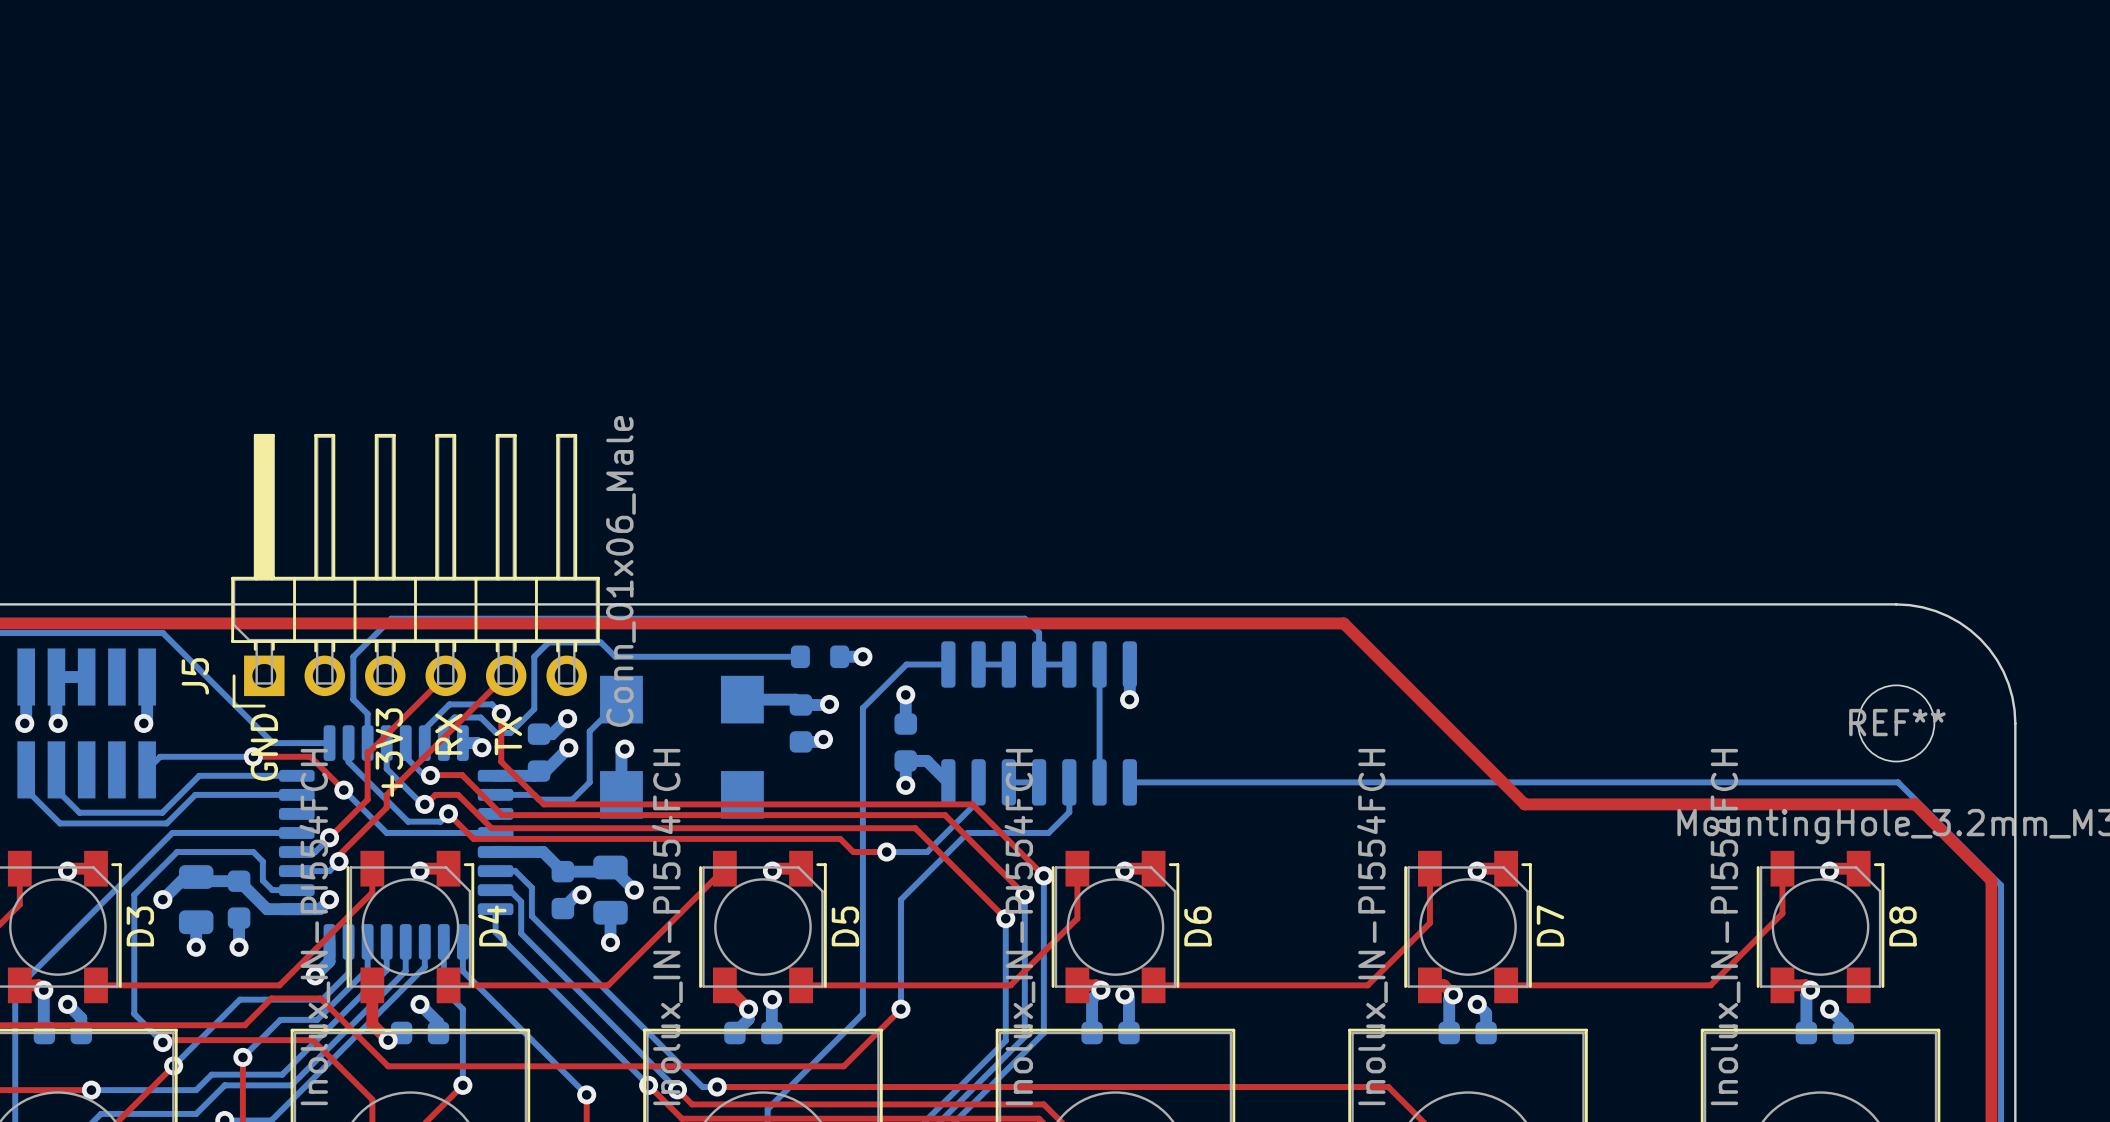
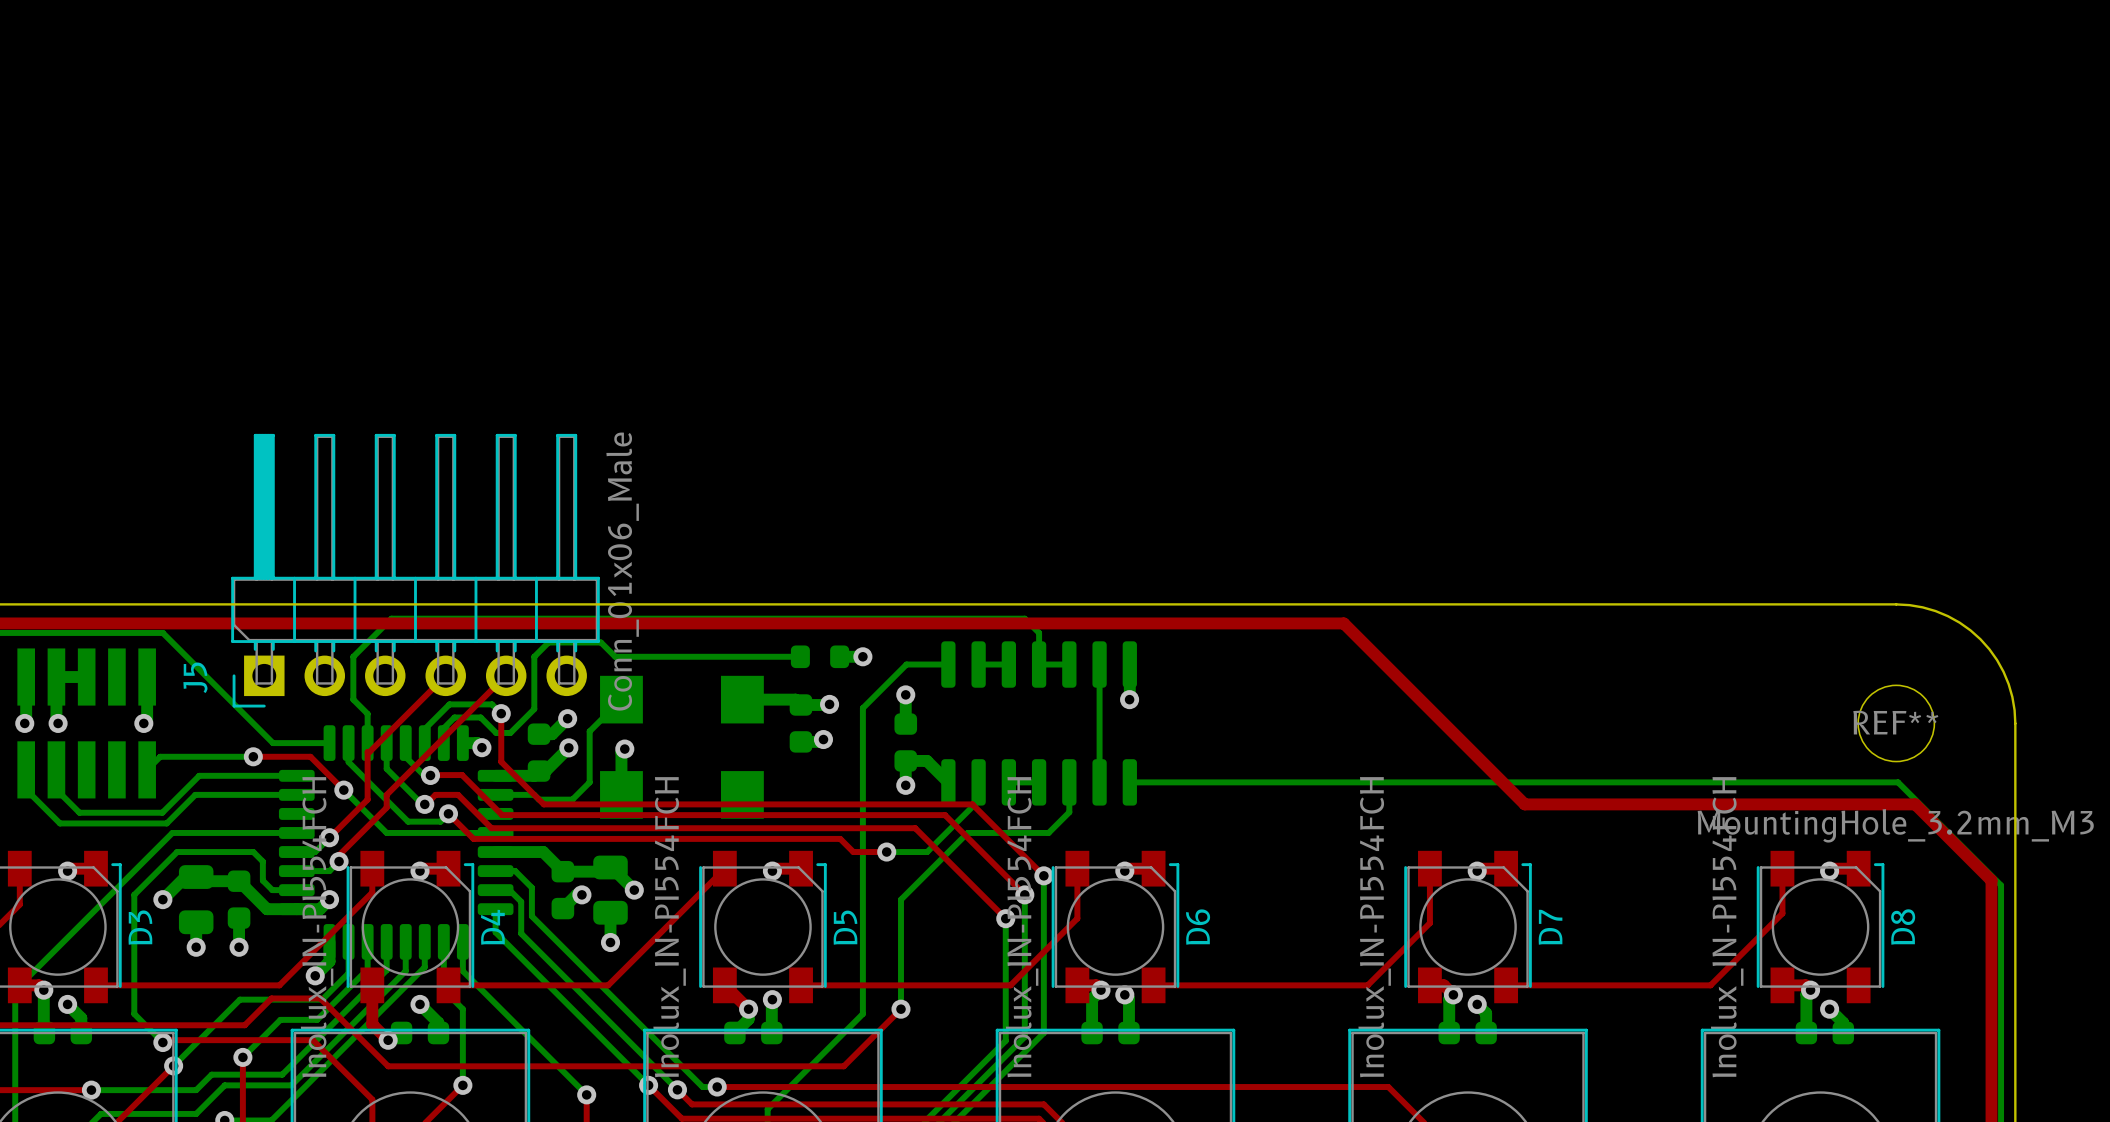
J5 text: RX (448, 734) -> none
J5 text: TX (508, 735) -> none
J5 text: GND (264, 747) -> none
J5 text: +3V3 (389, 752) -> none

